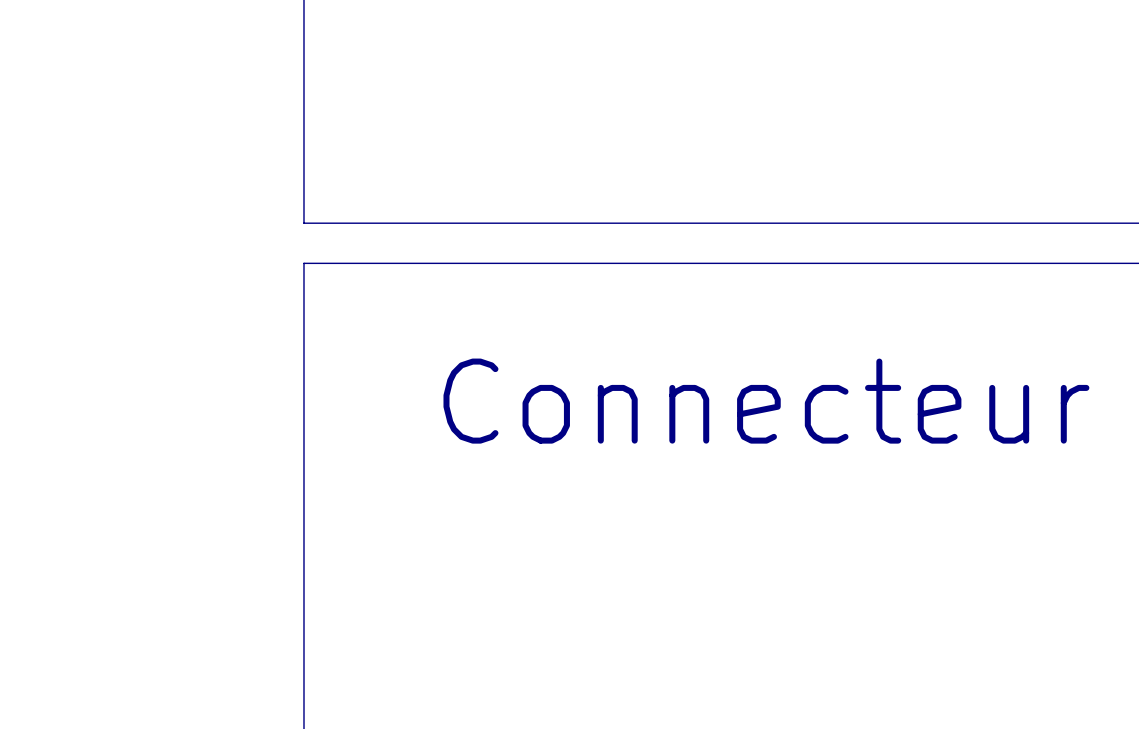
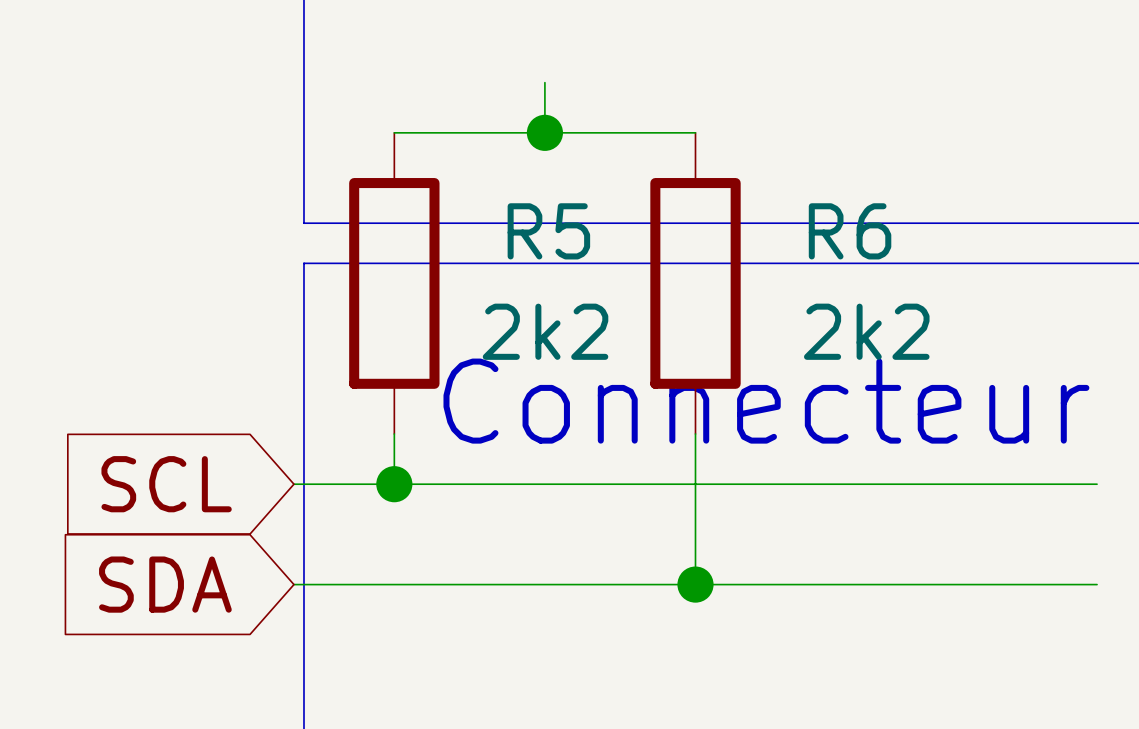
wire: none -> (544, 82) (544, 132)
wire: none -> (394, 132) (695, 132)
junction: none -> (544, 132)
R5: none -> 2k2 (394, 283)
R6: none -> 2k2 (695, 283)
wire: none -> (394, 434) (394, 484)
wire: none -> (695, 434) (695, 584)
global label: none -> SCL (166, 484)
wire: none -> (293, 484) (1097, 484)
junction: none -> (394, 484)
global label: none -> SDA (165, 584)
wire: none -> (293, 584) (1097, 584)
junction: none -> (695, 584)

